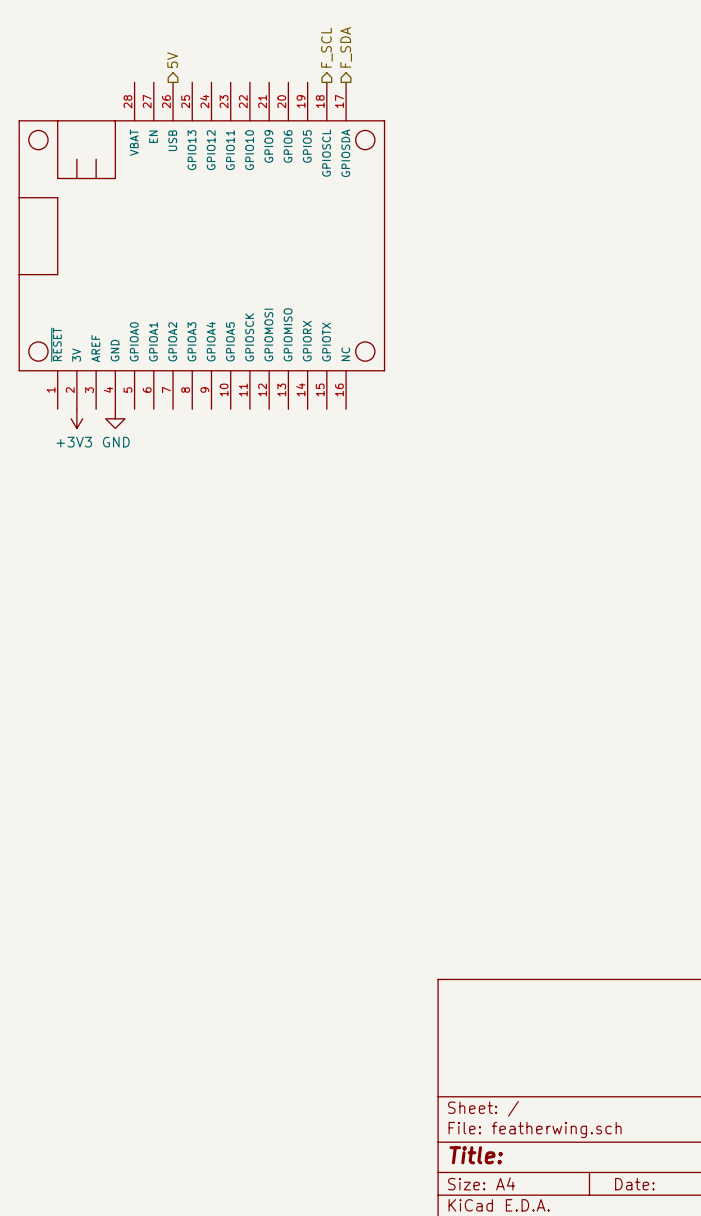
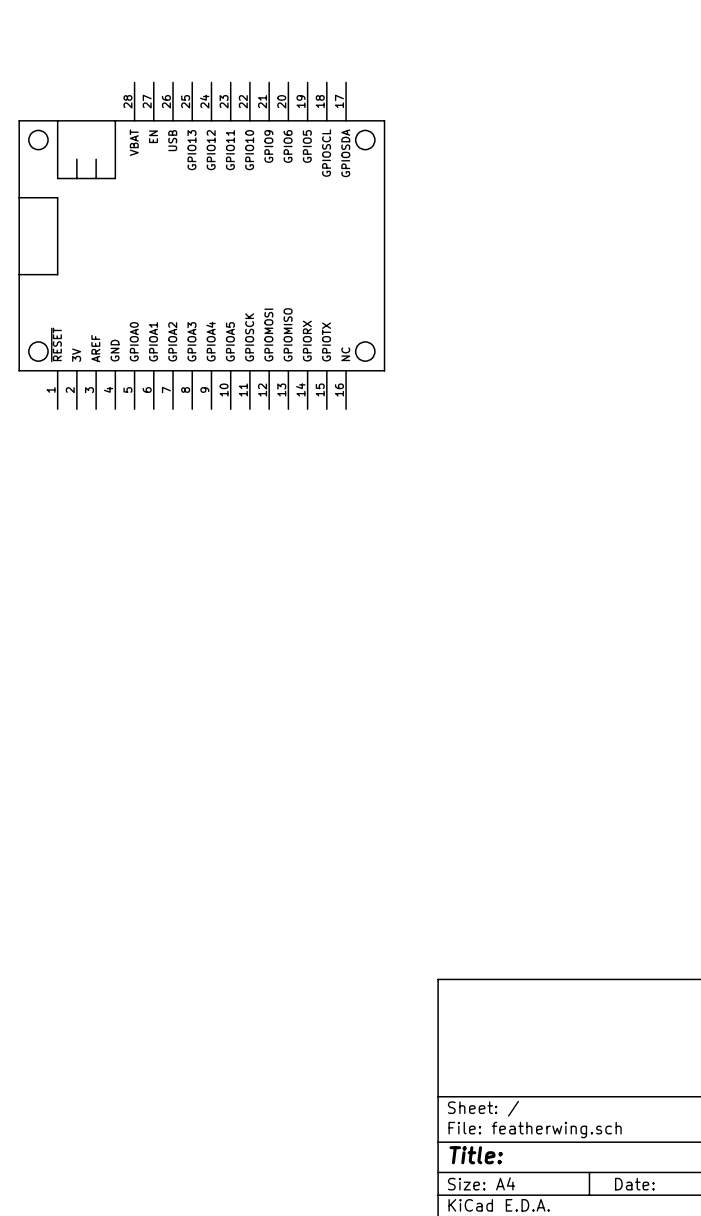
hierarchical label: F_SCL (326, 47) -> none
hierarchical label: F_SDA (346, 47) -> none
hierarchical label: 5V (172, 60) -> none
power symbol: +3V3 (76, 418) -> none
power symbol: GND (115, 418) -> none

